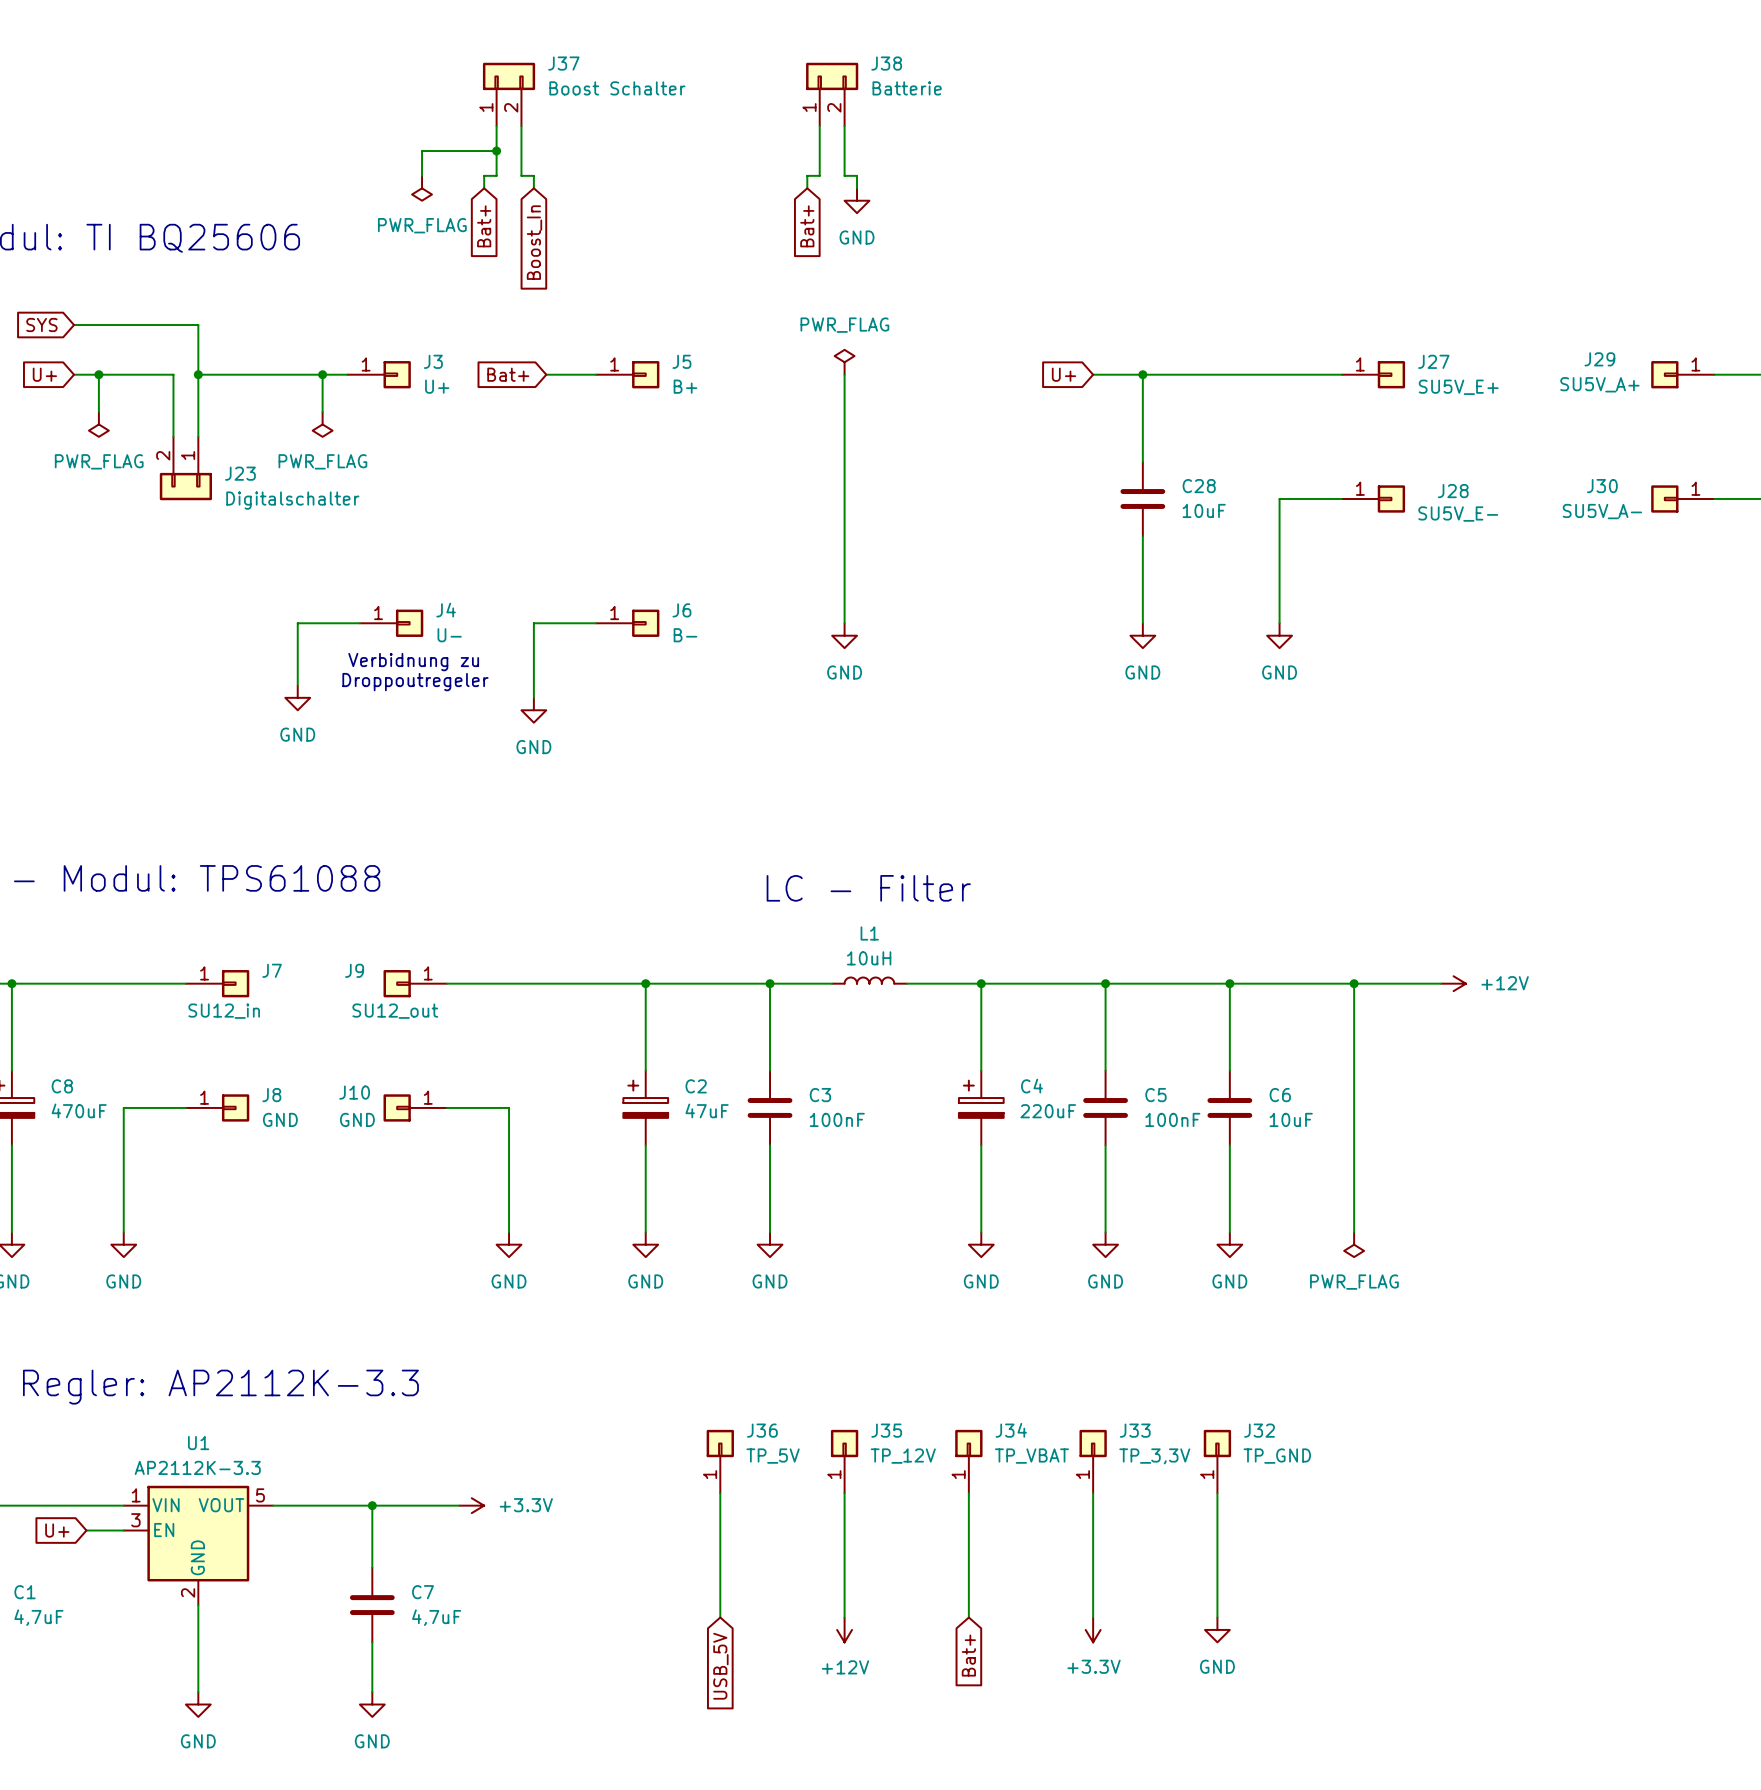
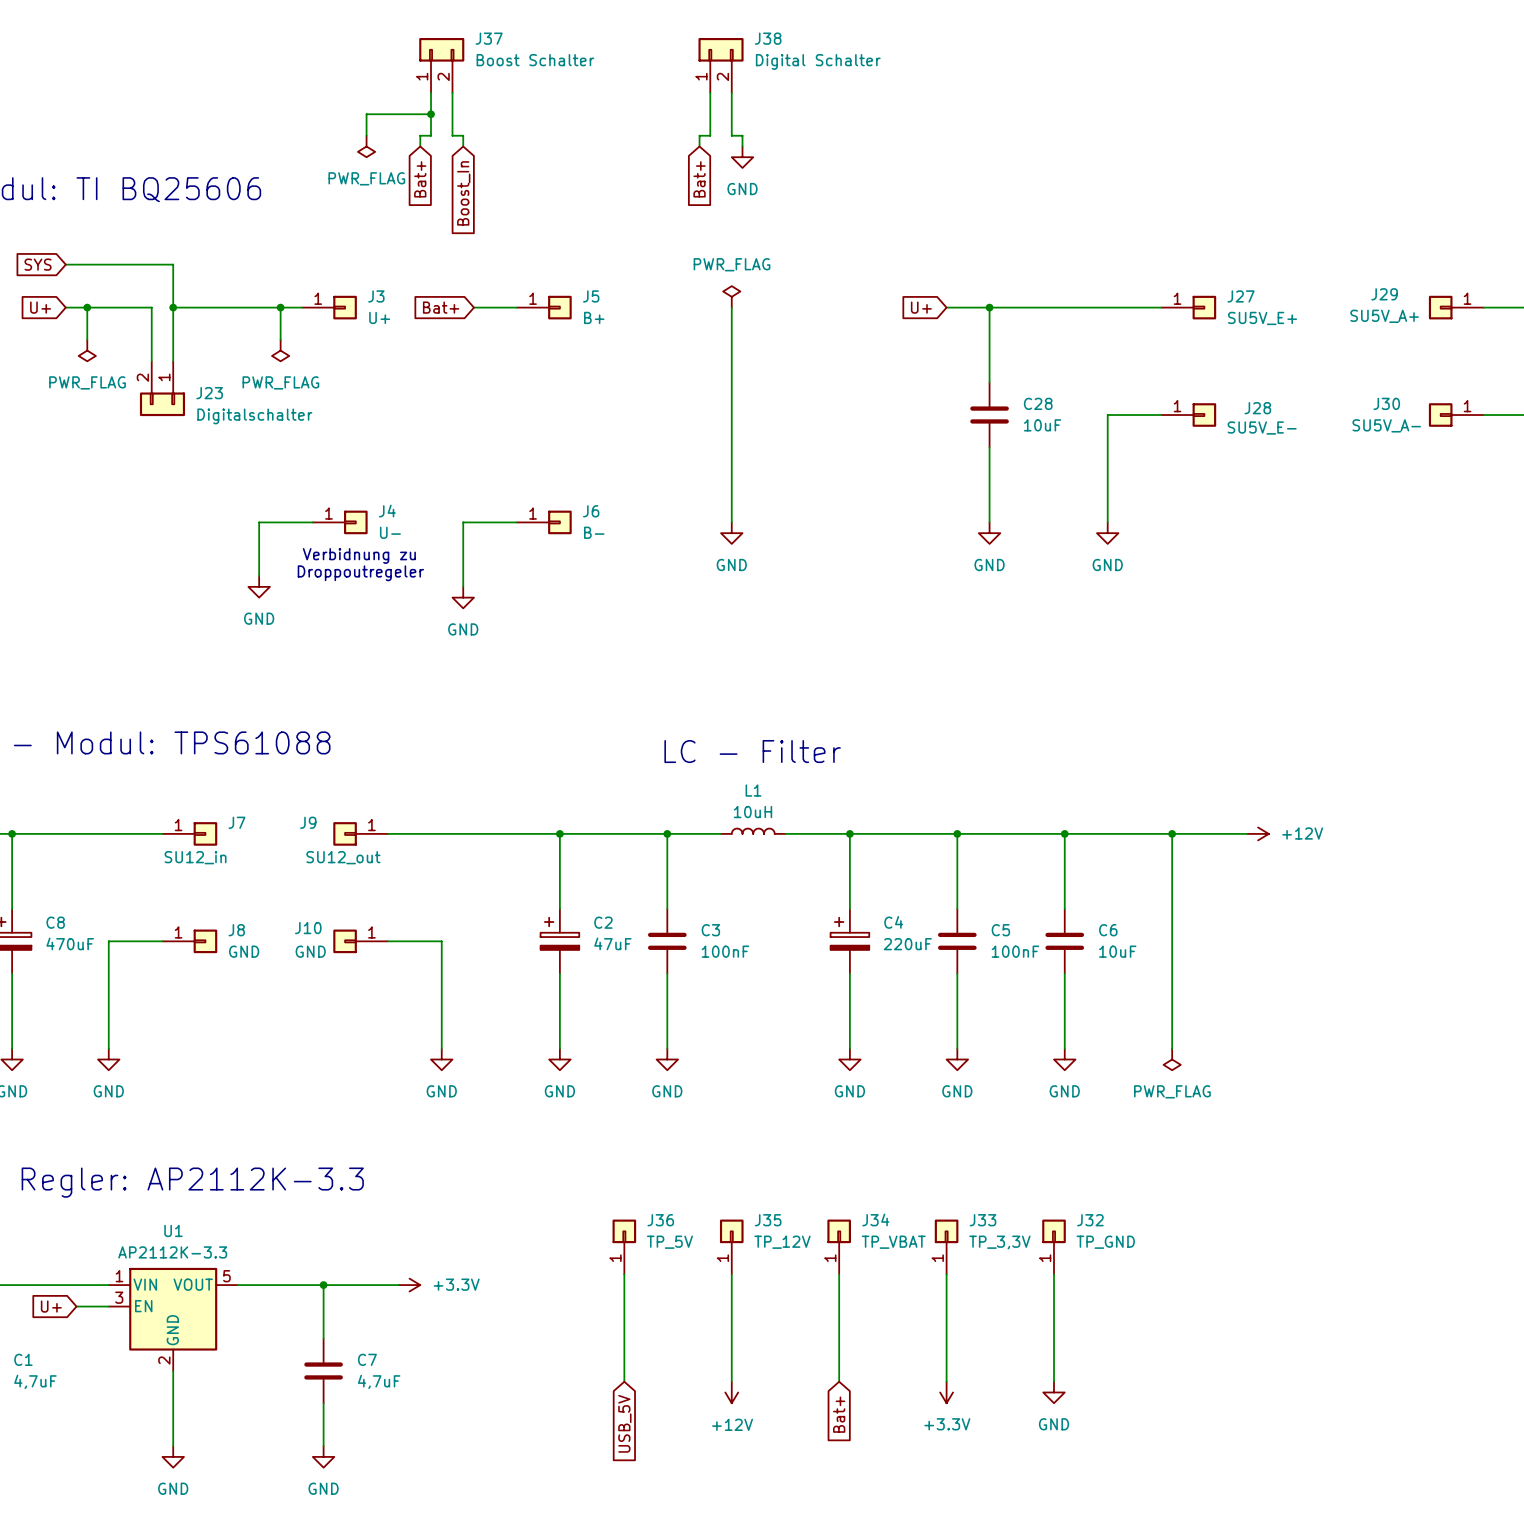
J38 value: Batterie (907, 88) -> Digital Schalter (818, 61)

